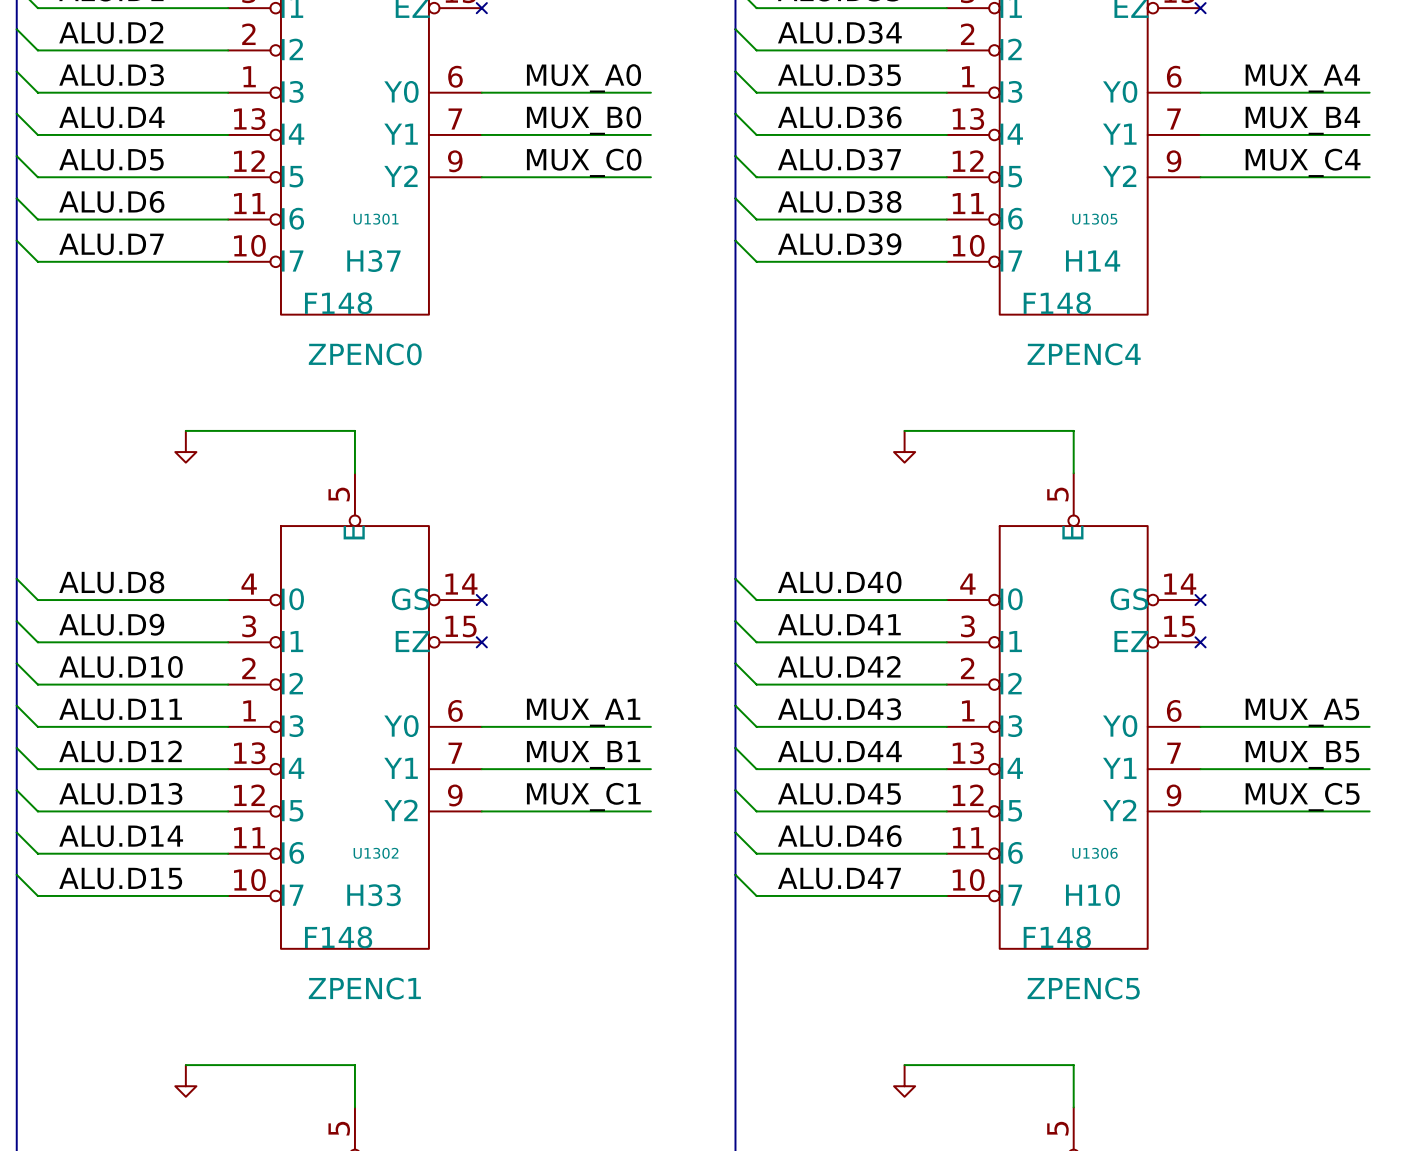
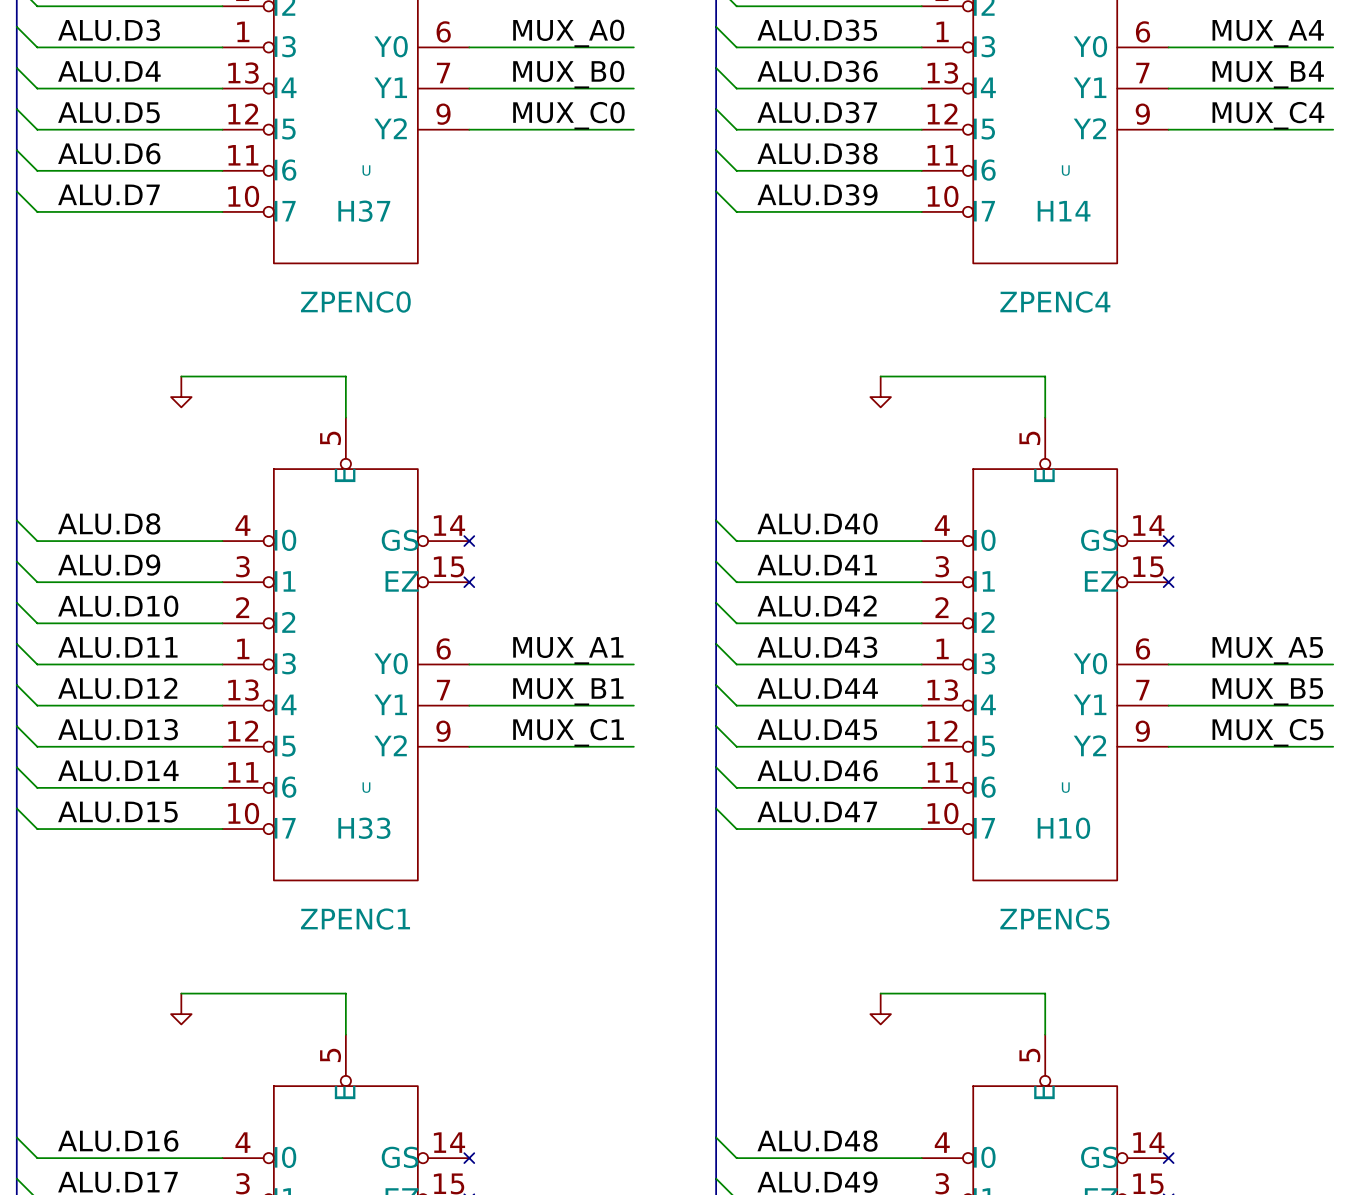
U1301 name: U1301 (376, 219) -> U (366, 170)
U1305 name: U1305 (1094, 219) -> U (1065, 170)
U1301 value: F148 (338, 303) -> none
U1305 value: F148 (1057, 303) -> none
U1302 name: U1302 (376, 853) -> U (366, 787)
U1306 name: U1306 (1095, 853) -> U (1065, 787)
U1302 value: F148 (338, 937) -> none
U1306 value: F148 (1057, 937) -> none

